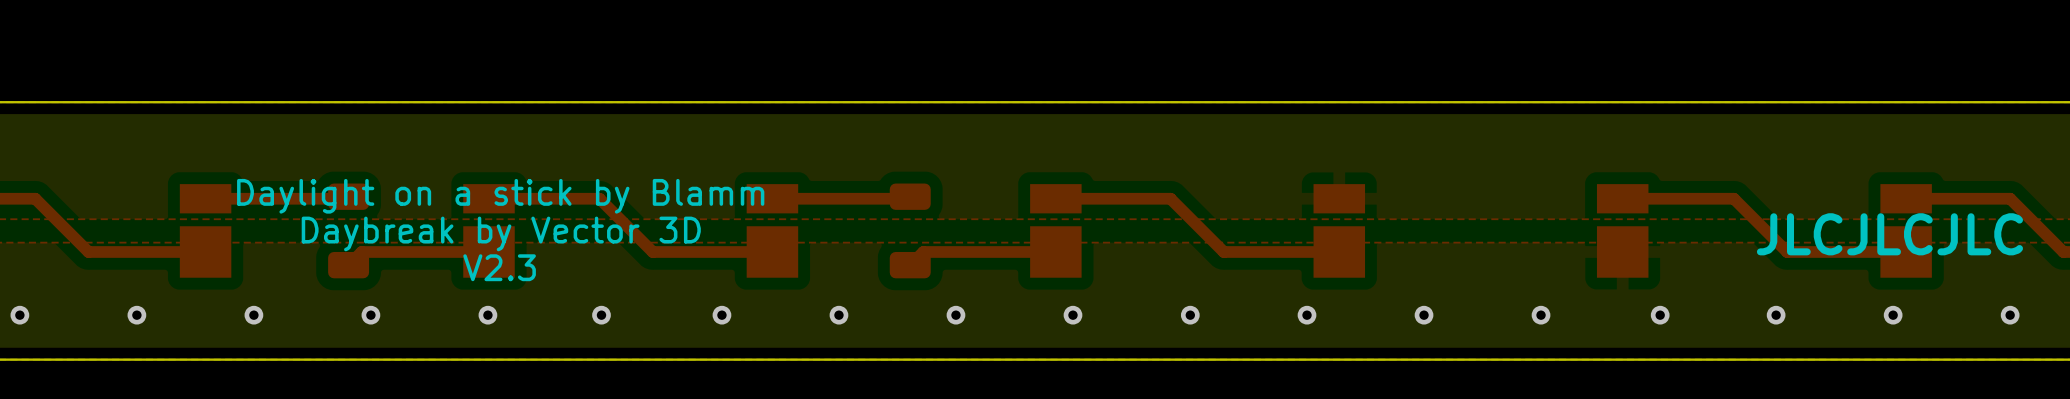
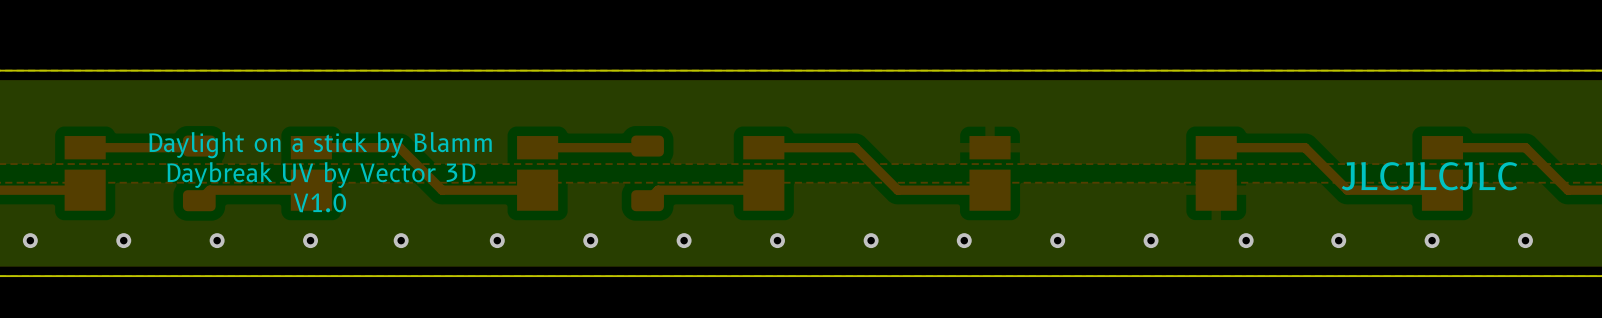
text: Daybreak by Vector 3D (501, 233) -> Daybreak UV by Vector 3D (321, 175)
text: V2.3 (499, 267) -> V1.0 (319, 202)

